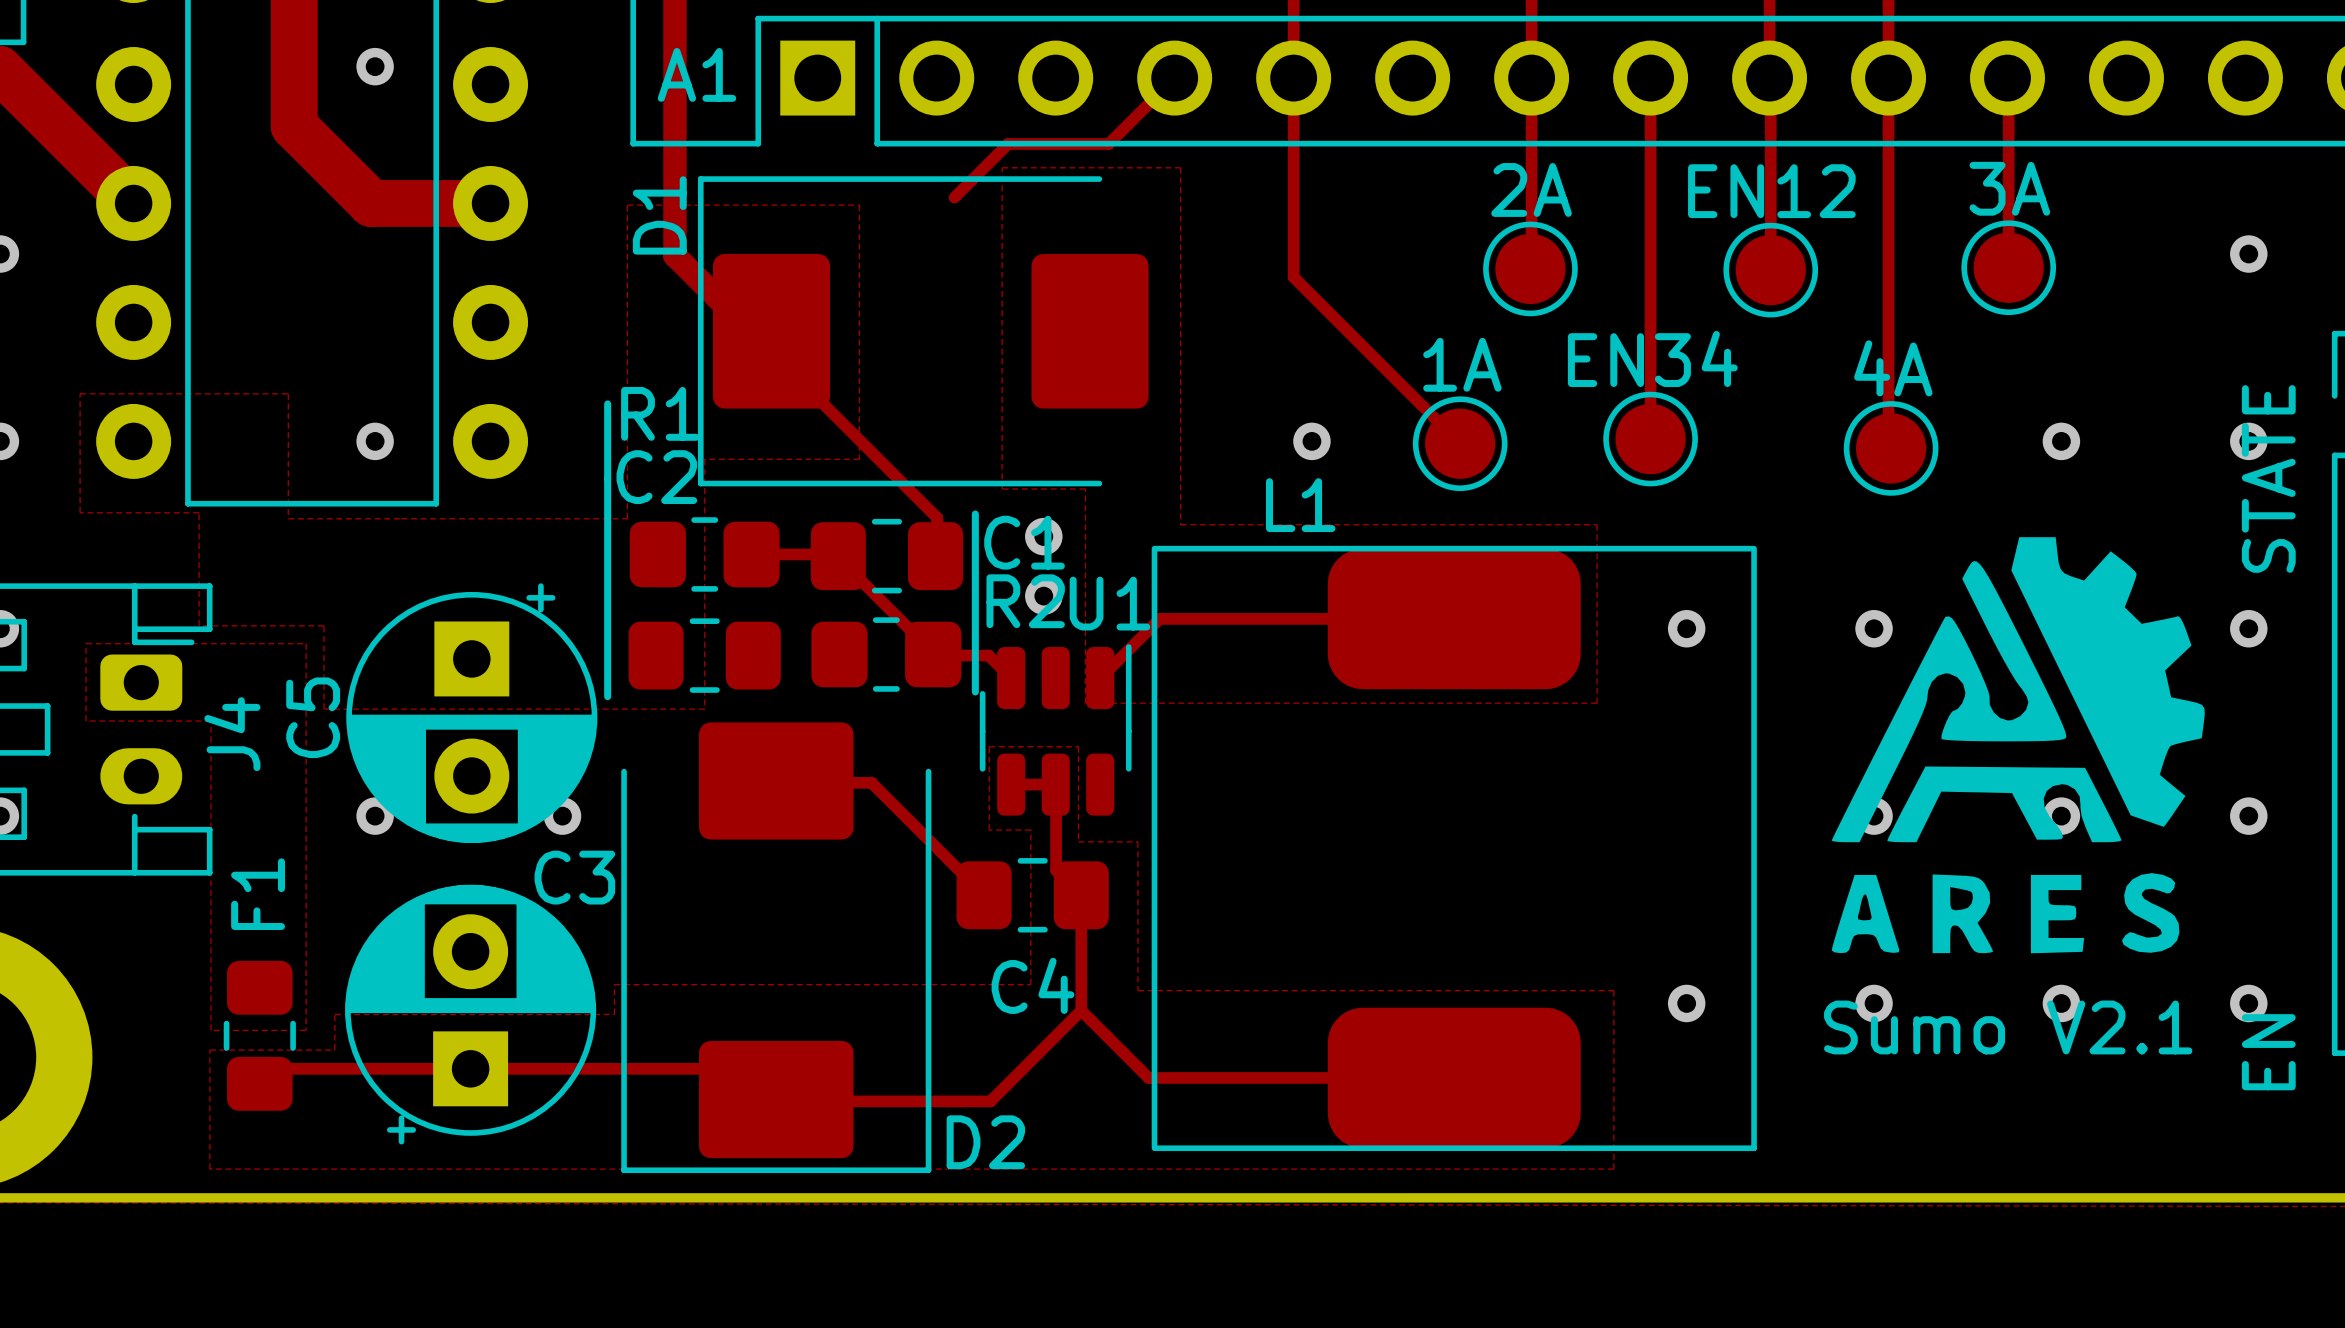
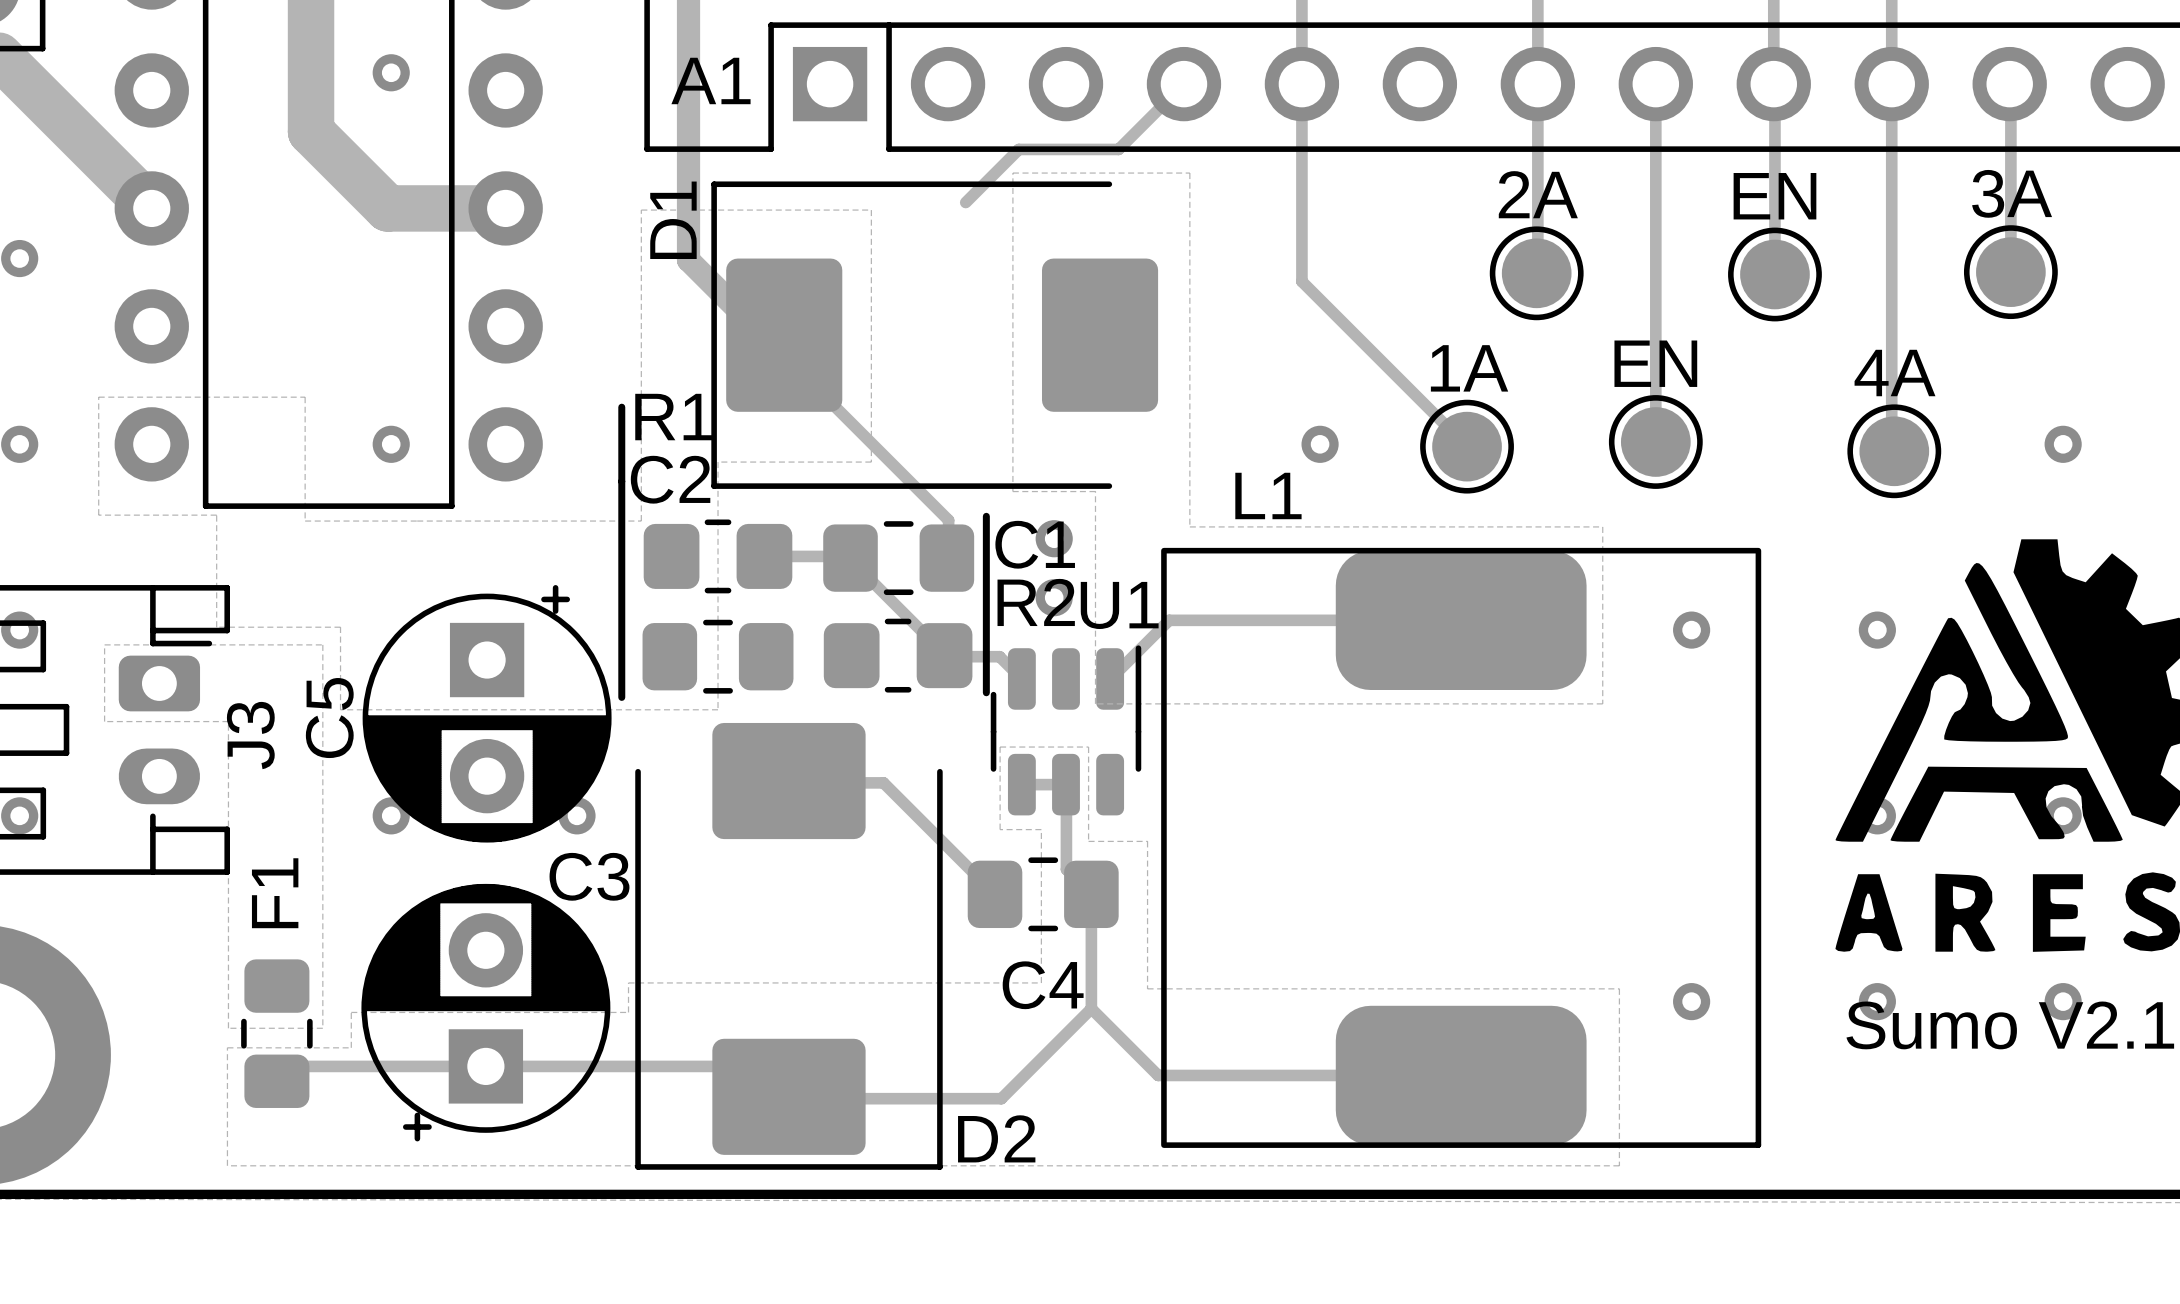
EN12 name: EN12 (1771, 191) -> EN (1774, 196)
EN34 name: EN34 (1652, 358) -> EN (1655, 363)
L1 name position: L1 (1300, 505) -> L1 (1268, 495)
J4 name: J4 (232, 734) -> J3 (250, 735)

